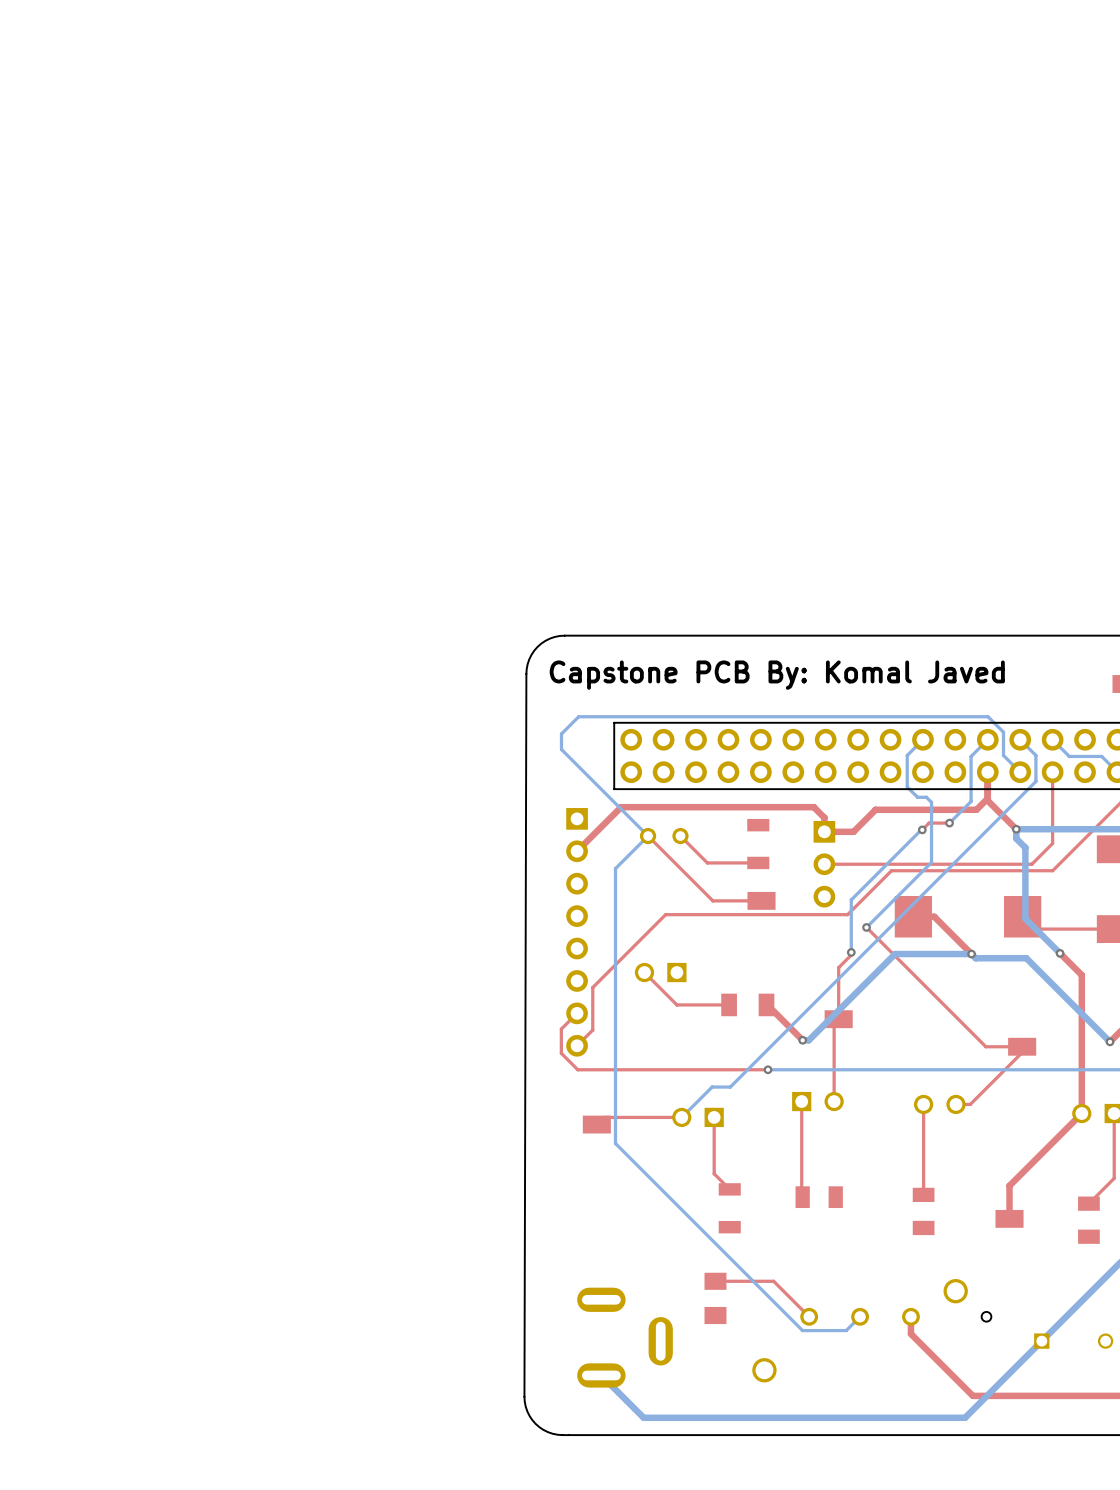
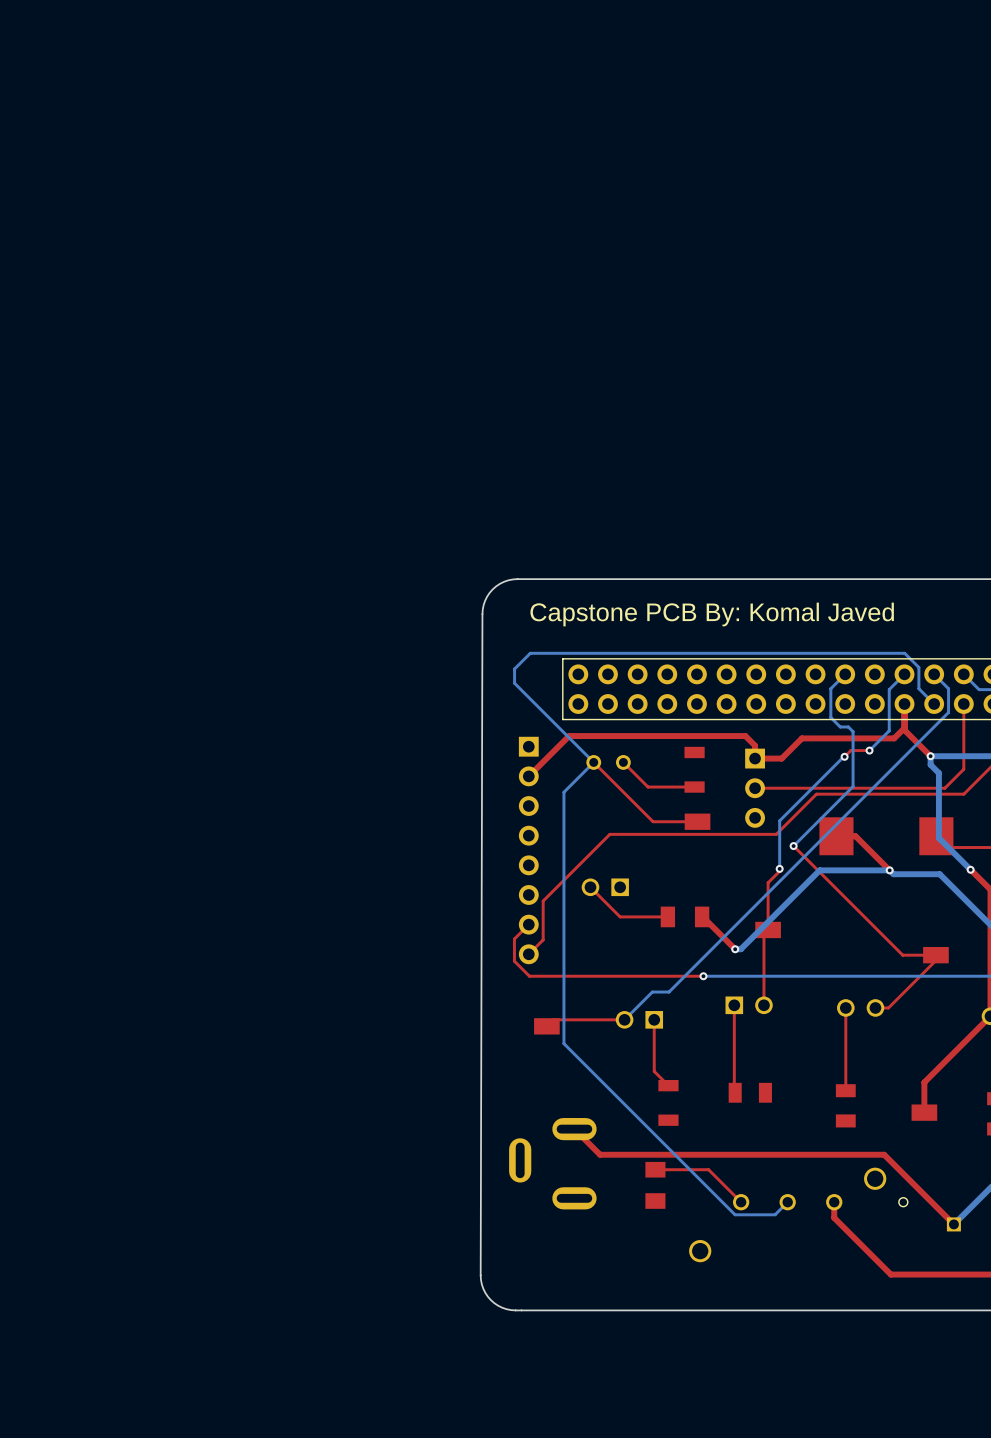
top track: none -> (574, 1129) (600, 1154) (884, 1154) (953, 1224)
part rotation: 0° (624, 1337) -> 180° (552, 1163)
part position: (624, 1337) -> (552, 1163)
bottom track: (1041, 1341) (965, 1417) (643, 1417) (601, 1375) -> none

